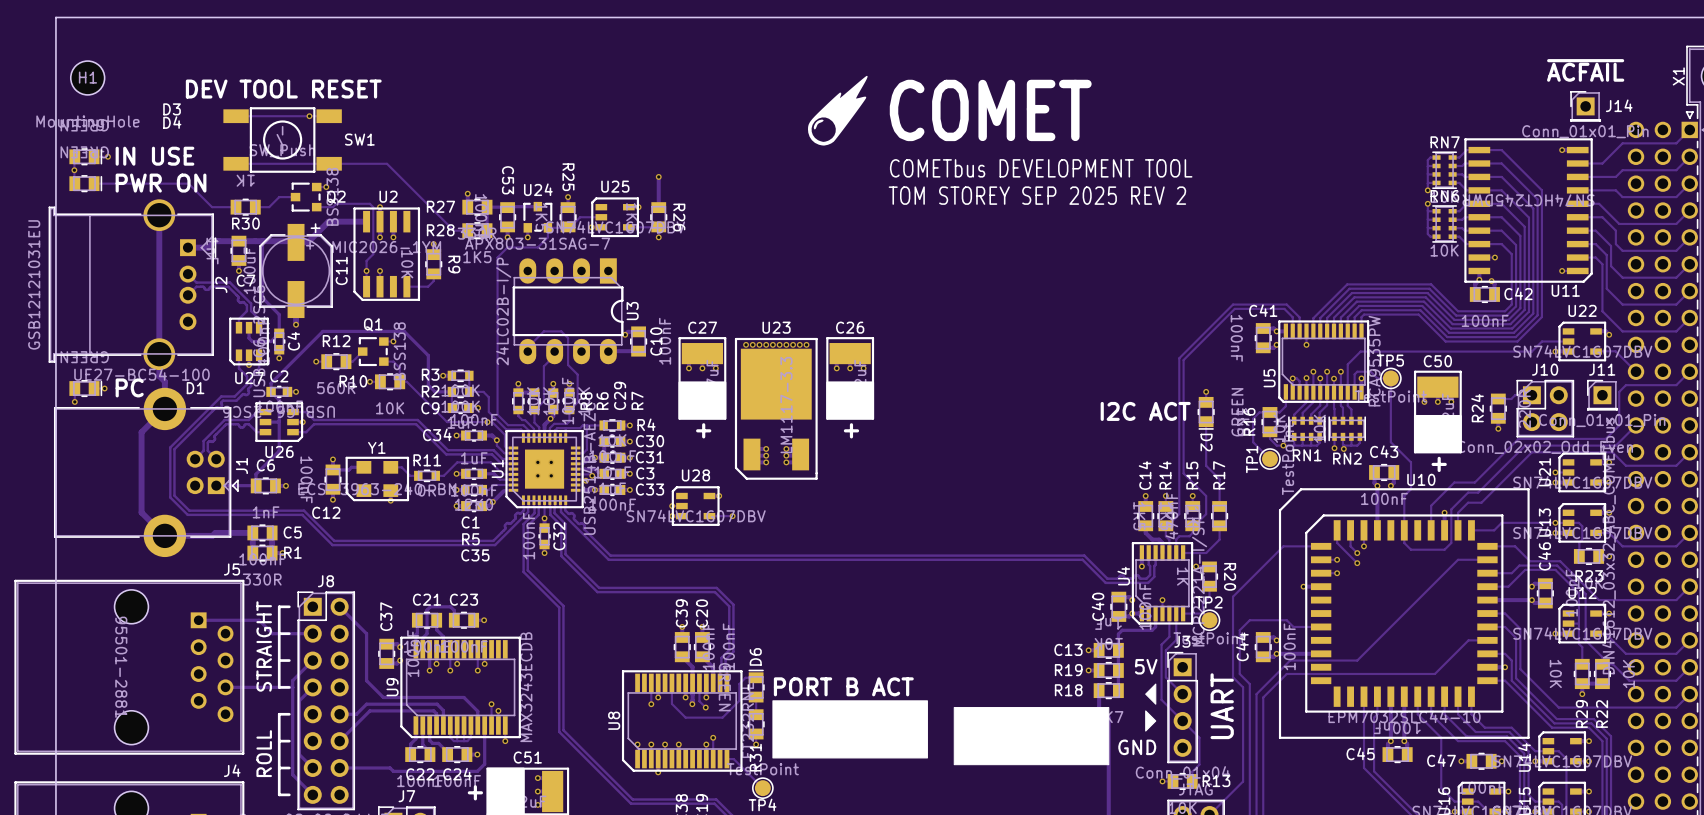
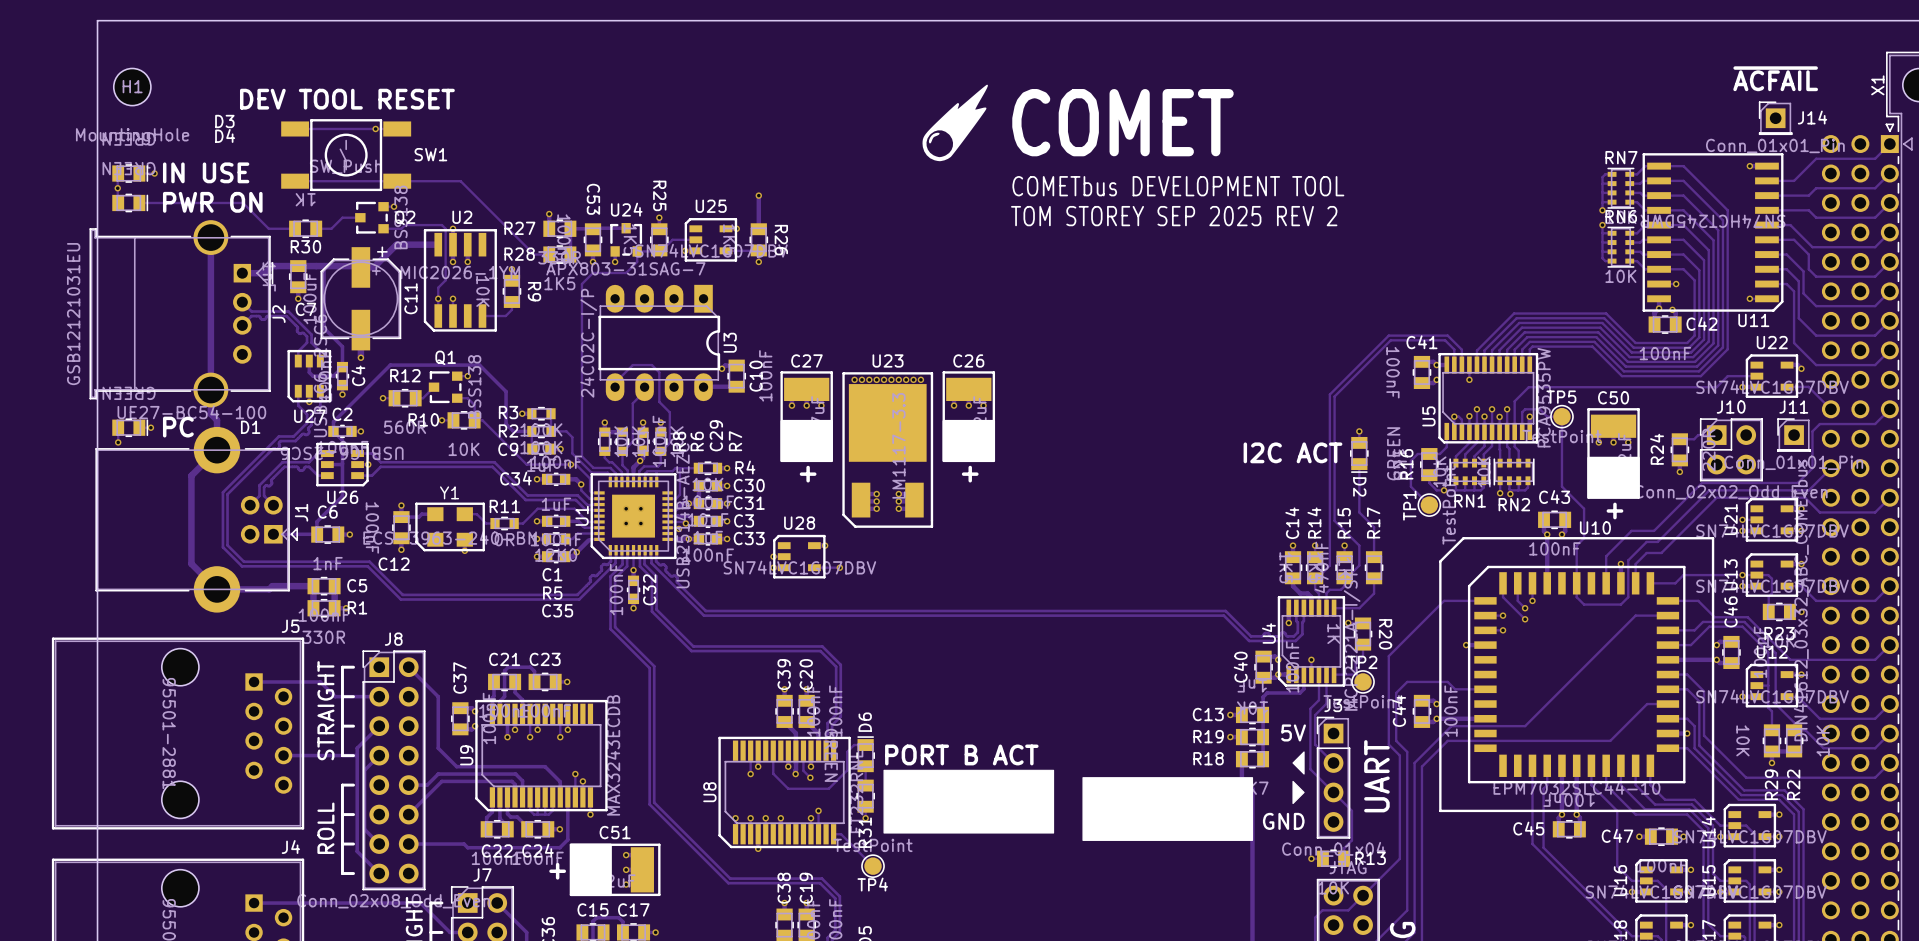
U3 value: 24LC02B-I/P (503, 311) -> 24C02C-I/P (588, 343)

